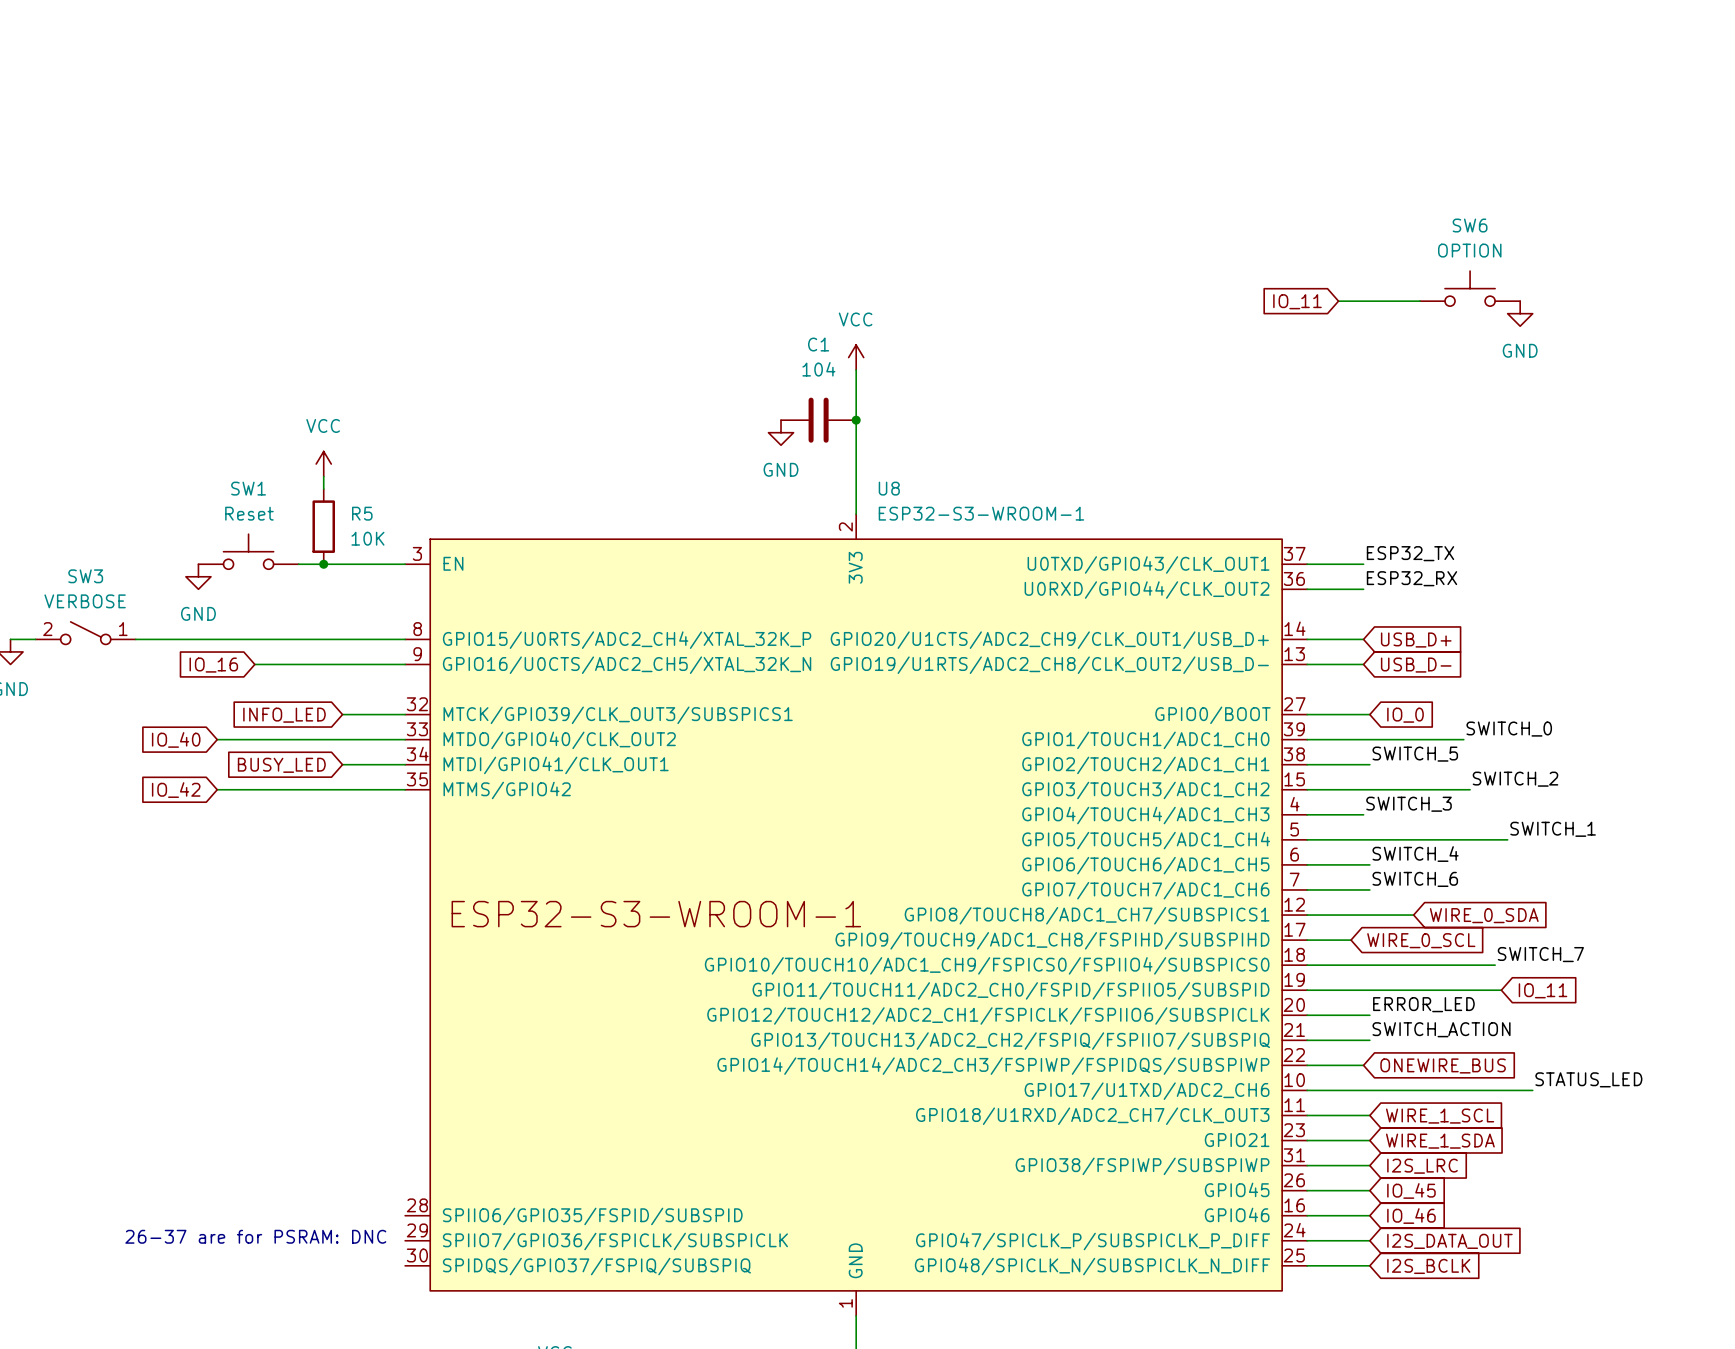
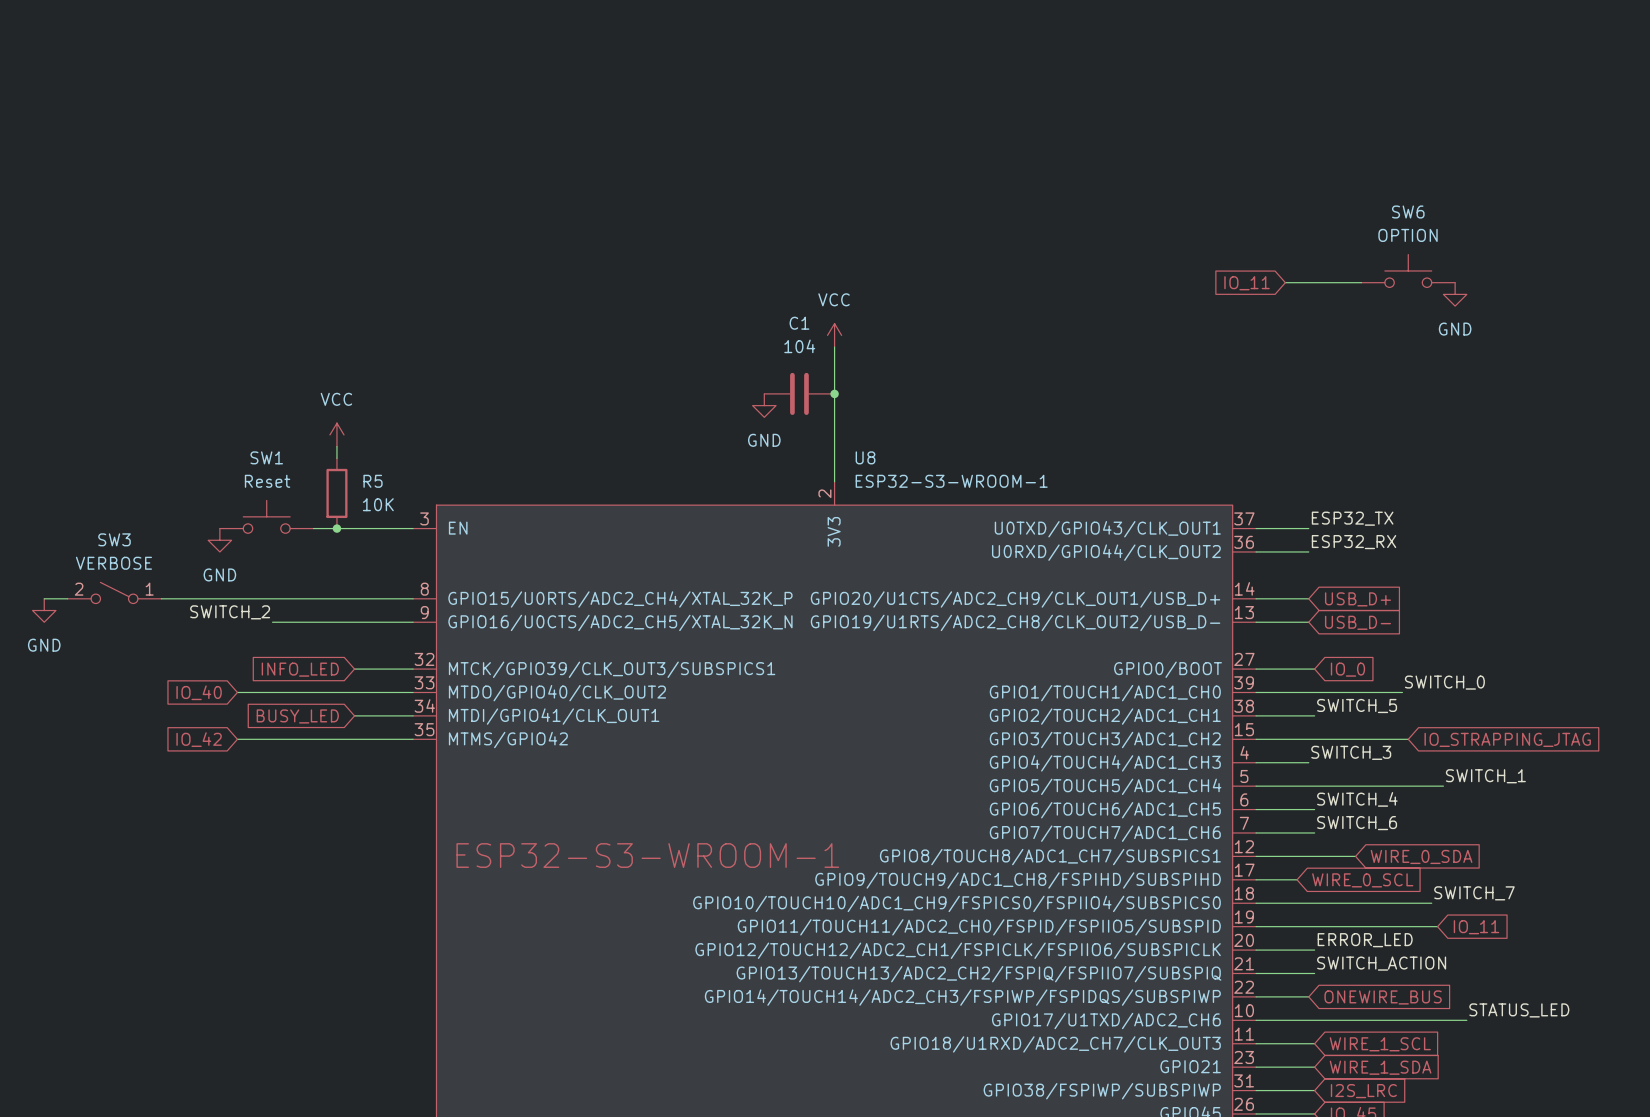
label: none -> SWITCH_2 (230, 612)
global label: IO_16 (213, 665) -> none
label: SWITCH_2 (1515, 779) -> none
global label: none -> IO_STRAPPING_JTAG (1507, 739)

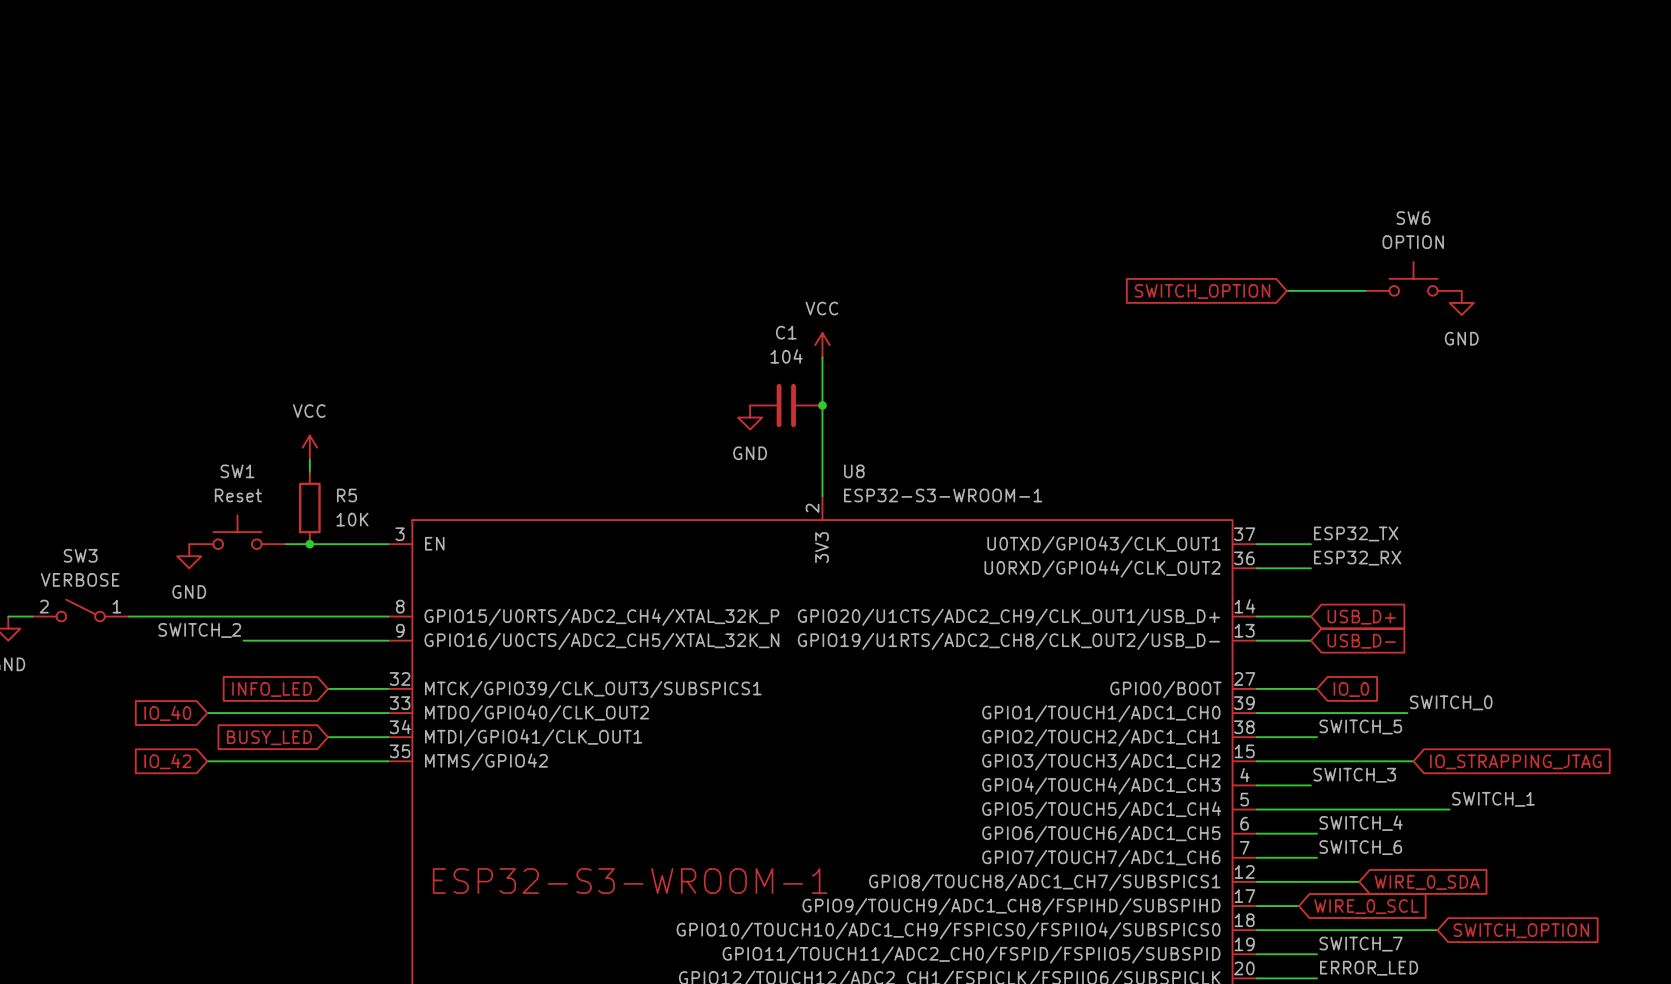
global label: IO_11 (1247, 283) -> SWITCH_OPTION (1202, 291)
label position: SWITCH_7 (1474, 893) -> SWITCH_7 (1361, 944)
global label: none -> SWITCH_OPTION (1521, 930)
wire: (1314, 926) (1437, 926) -> none
global label: IO_11 (1476, 927) -> none

